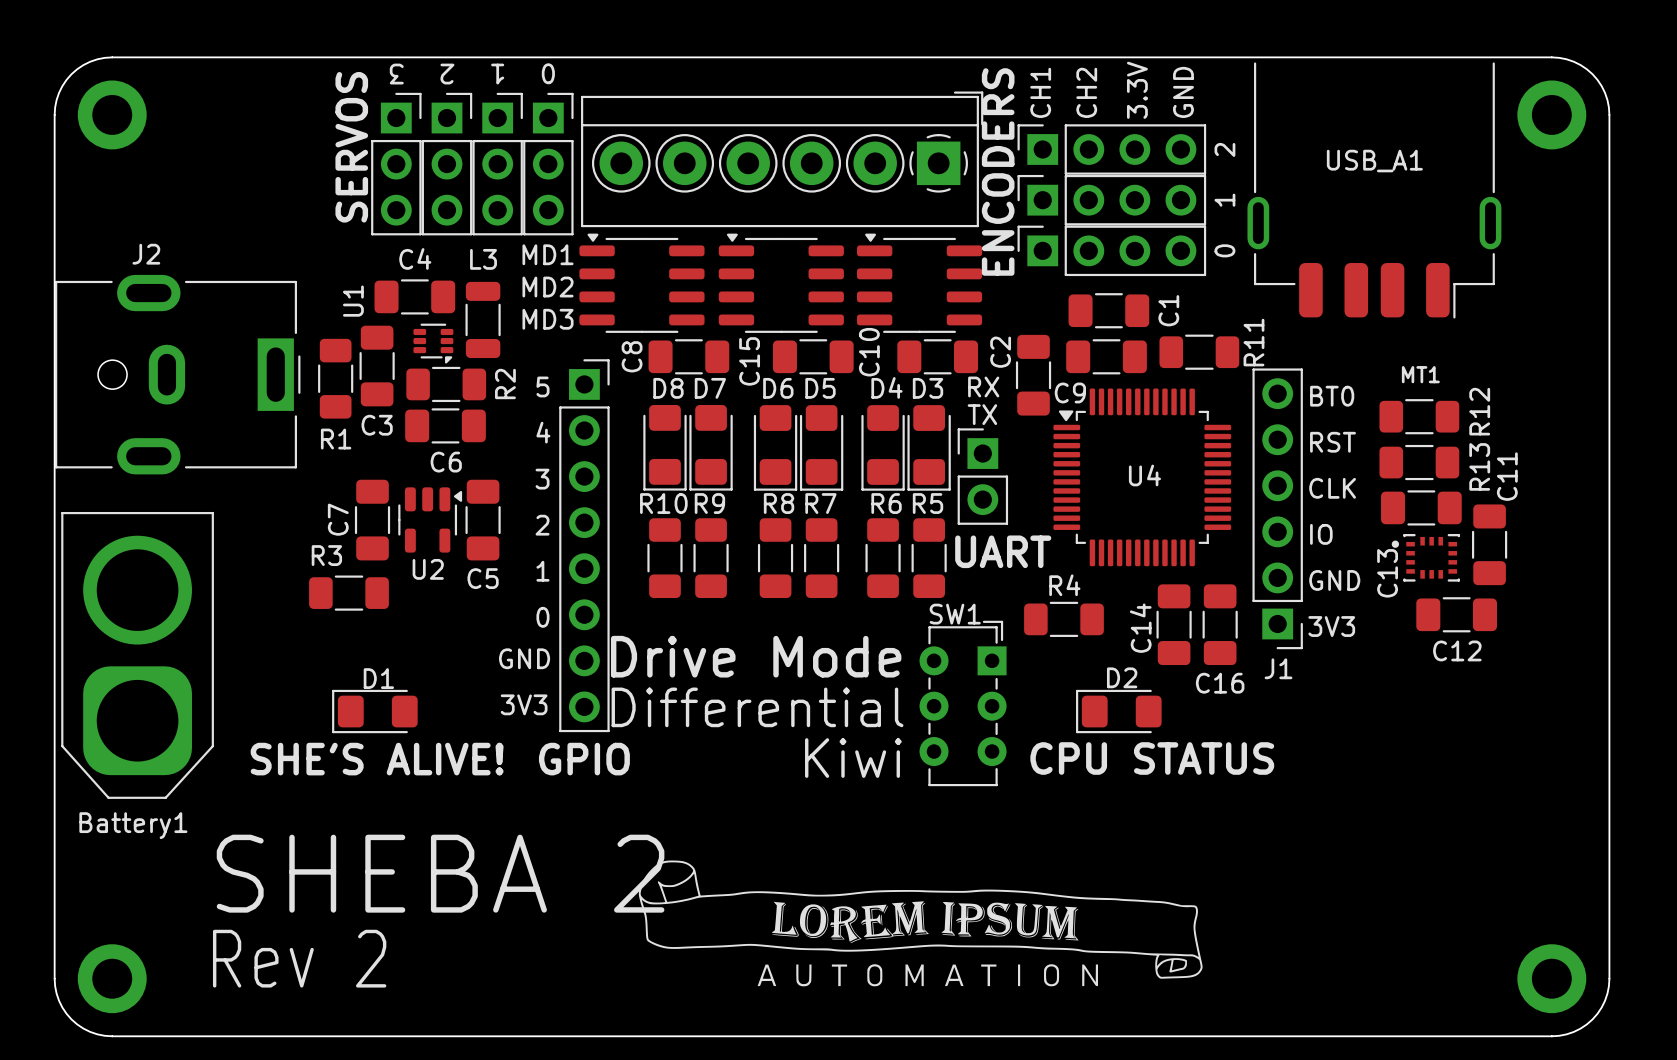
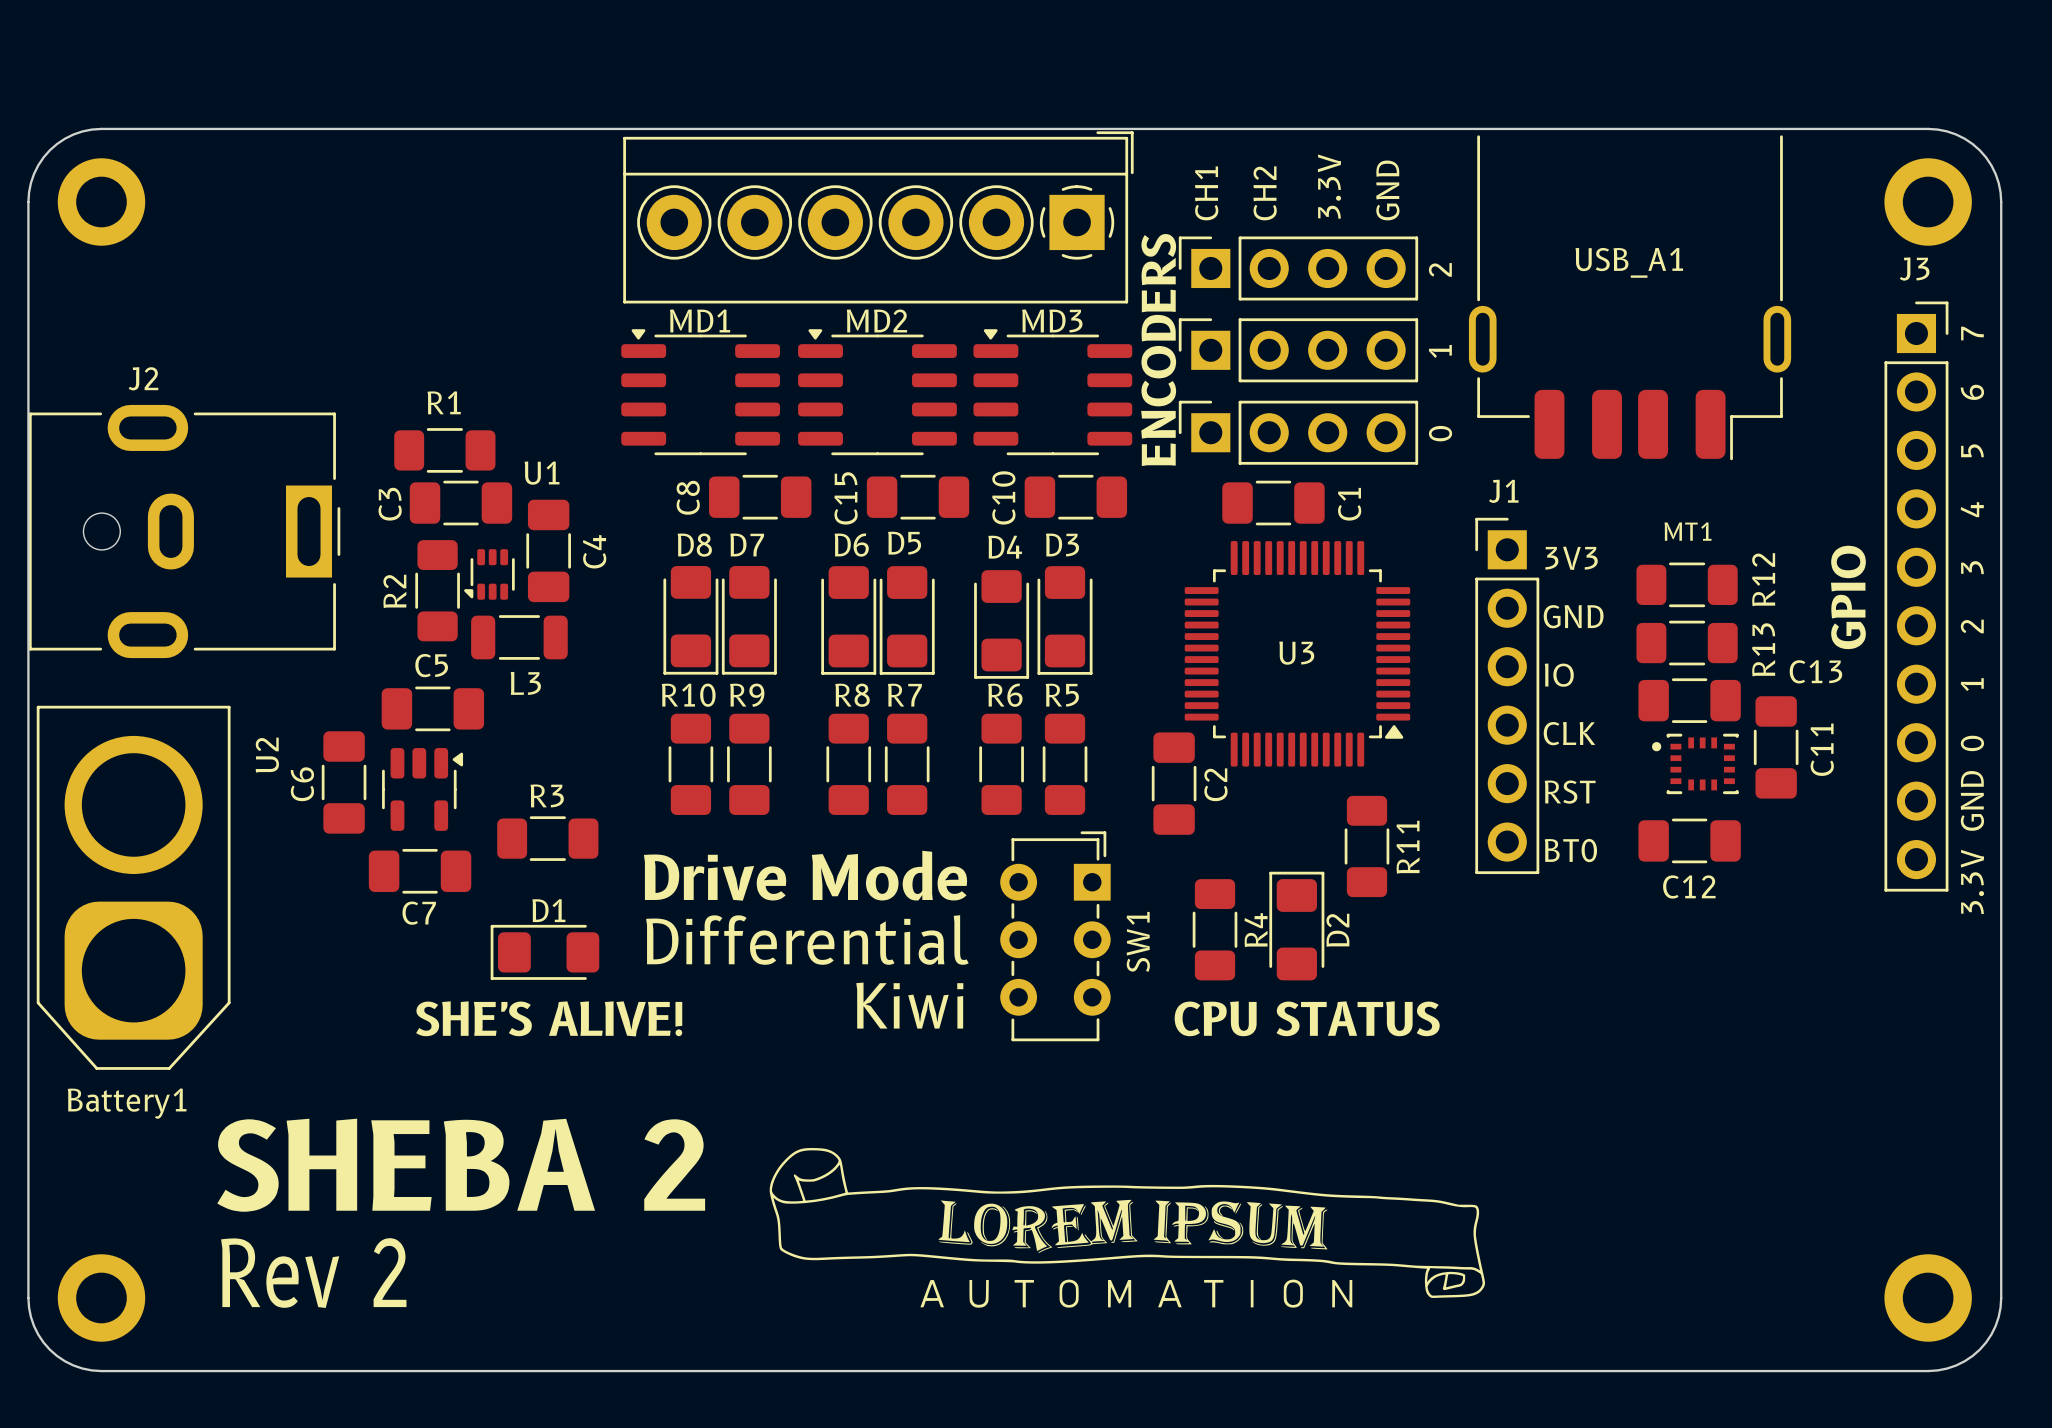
text: 0 (548, 73) -> none
text: 3 (396, 74) -> none
text: 2 (447, 74) -> none
text: 1 (497, 74) -> none
text position: 3.3V (1137, 90) -> 3.3V (1329, 186)
text position: CH1 (1040, 92) -> CH1 (1206, 193)
text position: CH2 (1086, 92) -> CH2 (1265, 193)
text position: GND (1183, 92) -> GND (1387, 190)
text: SERVOS (351, 147) -> none
part: (1111, 149) -> none
text position: 2 (1224, 149) -> 2 (1440, 269)
part position: (782, 159) -> (878, 217)
part: (396, 164) -> none
part: (447, 164) -> none
part: (497, 164) -> none
part: (548, 164) -> none
part: none -> (1298, 268)
text position: ENCODERS (998, 171) -> ENCODERS (1158, 350)
USB_A1 position: (1374, 190) -> (1630, 297)
part: (1111, 200) -> none
text position: 1 (1224, 200) -> 1 (1440, 351)
text: none -> 7 (1972, 333)
part: none -> (1298, 350)
part: (1111, 250) -> none
text position: 0 (1224, 250) -> 0 (1440, 433)
MD1 name position: MD1 (548, 254) -> MD1 (700, 320)
L3 name position: L3 (483, 259) -> L3 (525, 683)
text: none -> 6 (1972, 392)
MD1 position: (641, 283) -> (700, 392)
MD2 position: (781, 283) -> (877, 392)
MD3 position: (919, 283) -> (1052, 392)
MD2 name position: MD2 (548, 287) -> MD2 (876, 320)
C4 rotation: 0° (414, 296) -> 90° clockwise (548, 550)
C4 position: (414, 296) -> (548, 550)
part: none -> (1298, 432)
C1 position: (1108, 310) -> (1273, 503)
text: none -> 5 (1972, 450)
L3 rotation: 0° (483, 319) -> 90° clockwise (519, 637)
L3 position: (483, 319) -> (519, 637)
MD3 name position: MD3 (548, 319) -> MD3 (1052, 320)
U1 rotation: 0° (433, 343) -> 90° clockwise (489, 574)
U1 position: (433, 343) -> (489, 574)
C10 name position: C10 (869, 352) -> C10 (1003, 497)
C2 name position: C2 (1000, 352) -> C2 (1215, 784)
R11 rotation: 0° (1199, 352) -> 90° clockwise (1367, 846)
R11 position: (1199, 352) -> (1367, 846)
C8 position: (688, 356) -> (760, 497)
C15 position: (813, 356) -> (918, 497)
C10 position: (937, 356) -> (1075, 497)
C9: (1106, 356) -> none
text: none -> 4 (1972, 509)
C15 name position: C15 (749, 361) -> C15 (846, 498)
C3 rotation: 0° (377, 366) -> 90° clockwise (460, 503)
C2 position: (1033, 375) -> (1174, 783)
R1 rotation: 0° (335, 378) -> 90° clockwise (444, 450)
R1 position: (335, 378) -> (444, 450)
R2 rotation: 0° (446, 384) -> 90° clockwise (437, 590)
R2 position: (446, 384) -> (437, 590)
R2 name position: R2 (505, 384) -> R2 (394, 591)
text: 5 (542, 386) -> none
text: RX (983, 386) -> none
D5 name: D5 (820, 388) -> D4 (1005, 547)
text position: BT0 (1332, 396) -> BT0 (1570, 850)
text: none -> 3 (1972, 567)
text: TX (982, 414) -> none
R12 position: (1419, 416) -> (1687, 584)
C6 rotation: 0° (445, 425) -> 90° clockwise (344, 782)
C6 position: (445, 425) -> (344, 782)
text: none -> GPIO (1848, 597)
J3: none -> (1916, 596)
text: 4 (543, 432) -> none
R1 name position: R1 (336, 439) -> R1 (444, 402)
text: none -> GND (1573, 616)
text position: RST (1333, 442) -> RST (1570, 792)
D5: none -> (907, 620)
D8 position: (664, 447) -> (690, 620)
D7 position: (711, 447) -> (749, 620)
D6 position: (775, 447) -> (848, 620)
D4: (883, 447) -> none
D3 position: (929, 447) -> (1065, 620)
text: none -> 2 (1972, 626)
R13 position: (1419, 462) -> (1687, 643)
U3: none -> (1297, 653)
part: (982, 476) -> none
C11 name position: C11 (1507, 476) -> C11 (1822, 749)
U4: (1142, 477) -> none
text: 3 (542, 479) -> none
text position: CLK (1332, 488) -> CLK (1569, 733)
text: none -> 1 (1972, 684)
R7 name: R7 (820, 503) -> R6 (1005, 695)
C13 position: (1421, 507) -> (1689, 700)
J1 rotation: 0° (1277, 508) -> 180° (1507, 695)
C7 name position: C7 (338, 519) -> C7 (419, 913)
U2 position: (430, 519) -> (422, 789)
C7 rotation: 0° (372, 520) -> 90° clockwise (420, 871)
C7 position: (372, 520) -> (420, 871)
C5 rotation: 0° (483, 520) -> 90° clockwise (432, 708)
C5 position: (483, 520) -> (432, 708)
text: 2 (542, 525) -> none
text position: IO (1321, 534) -> IO (1559, 675)
text: none -> 0 (1972, 743)
C11 position: (1489, 544) -> (1776, 747)
part: (584, 545) -> none
text: UART (1003, 551) -> none
R3 name position: R3 (326, 555) -> R3 (547, 795)
MT1 position: (1425, 557) -> (1695, 763)
R10 position: (664, 558) -> (690, 764)
R9 position: (711, 558) -> (749, 764)
R7: none -> (907, 764)
R8 position: (775, 558) -> (848, 764)
R6: (883, 558) -> none
R5 position: (929, 558) -> (1065, 764)
U2 name rotation: 0° (428, 569) -> 90° counterclockwise (267, 755)
U2 name position: U2 (428, 569) -> U2 (267, 755)
text: 1 (542, 571) -> none
C13 name rotation: 0° (1387, 573) -> 90° clockwise (1815, 671)
C13 name position: C13 (1387, 573) -> C13 (1815, 671)
C5 name position: C5 (483, 578) -> C5 (431, 665)
text: GND (1334, 580) -> none
text: none -> GND (1972, 800)
R3 position: (349, 593) -> (547, 838)
SW1 name rotation: 0° (955, 614) -> 90° counterclockwise (1138, 941)
SW1 name position: SW1 (955, 614) -> SW1 (1138, 941)
C12 position: (1456, 614) -> (1689, 840)
text: 0 (542, 617) -> none
R4 rotation: 0° (1063, 619) -> 90° clockwise (1215, 929)
R4 position: (1063, 619) -> (1215, 929)
C14: (1174, 624) -> none
C16: (1220, 624) -> none
text position: 3V3 (1331, 626) -> 3V3 (1571, 558)
text: none -> 3.3V (1972, 881)
text position: Drive Mode (756, 656) -> Drive Mode (805, 875)
text: GND (524, 658) -> none
SW1 position: (963, 703) -> (1055, 936)
text: 3V3 (524, 704) -> none
text position: Differential (757, 707) -> Differential (807, 940)
D1 position: (374, 711) -> (544, 952)
D2 rotation: 0° (1118, 711) -> 90° clockwise (1296, 926)
D2 position: (1118, 711) -> (1296, 926)
text position: Kiwi (853, 758) -> Kiwi (909, 1005)
text position: CPU STATUS (1152, 758) -> CPU STATUS (1307, 1018)
text position: SHE'S ALIVE! (377, 759) -> SHE'S ALIVE! (549, 1018)
text: GPIO (584, 759) -> none

